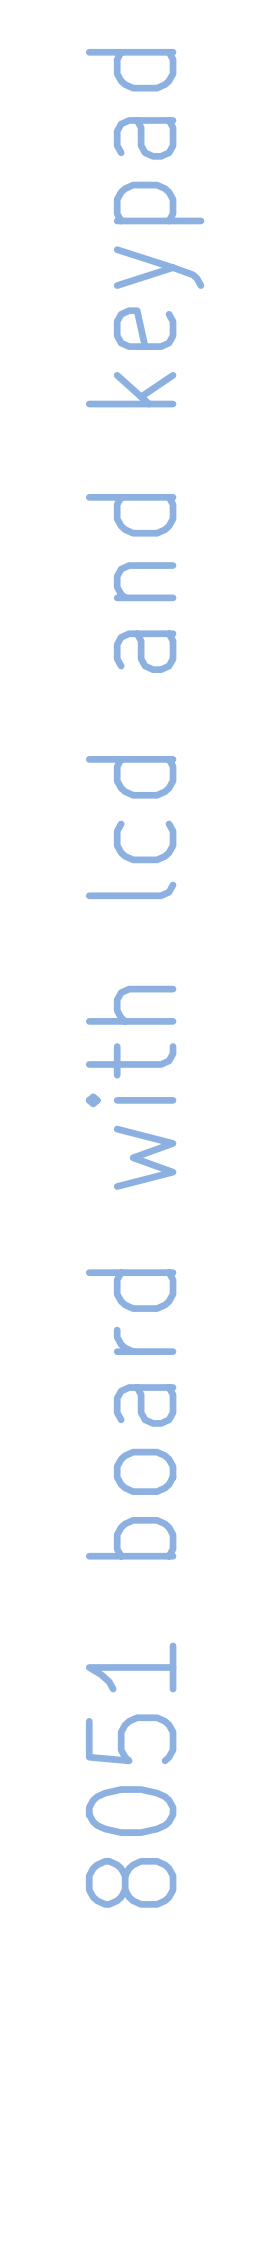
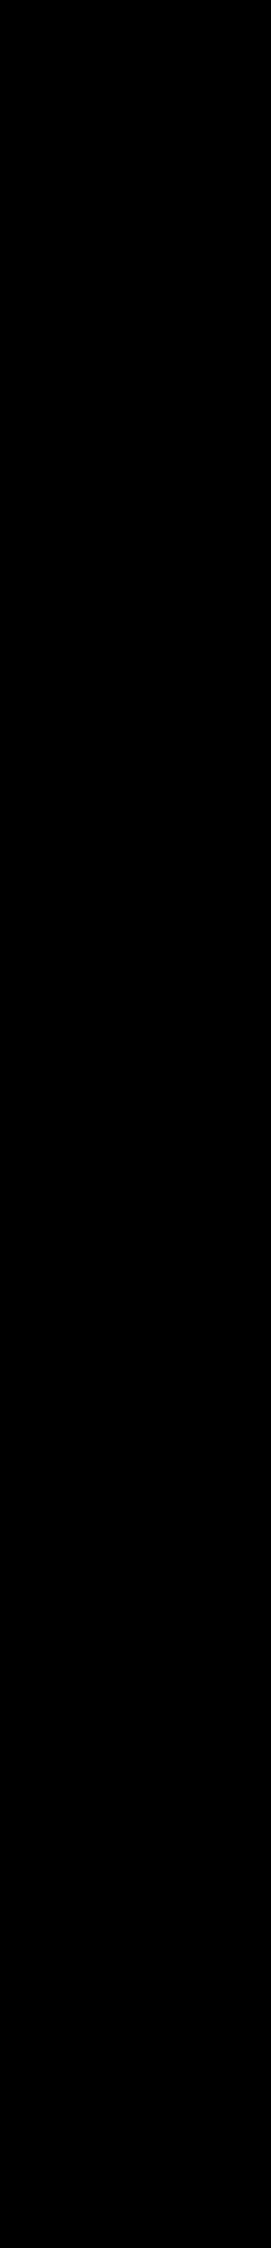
text: 8051 board with lcd and keypad (145, 978) -> none

